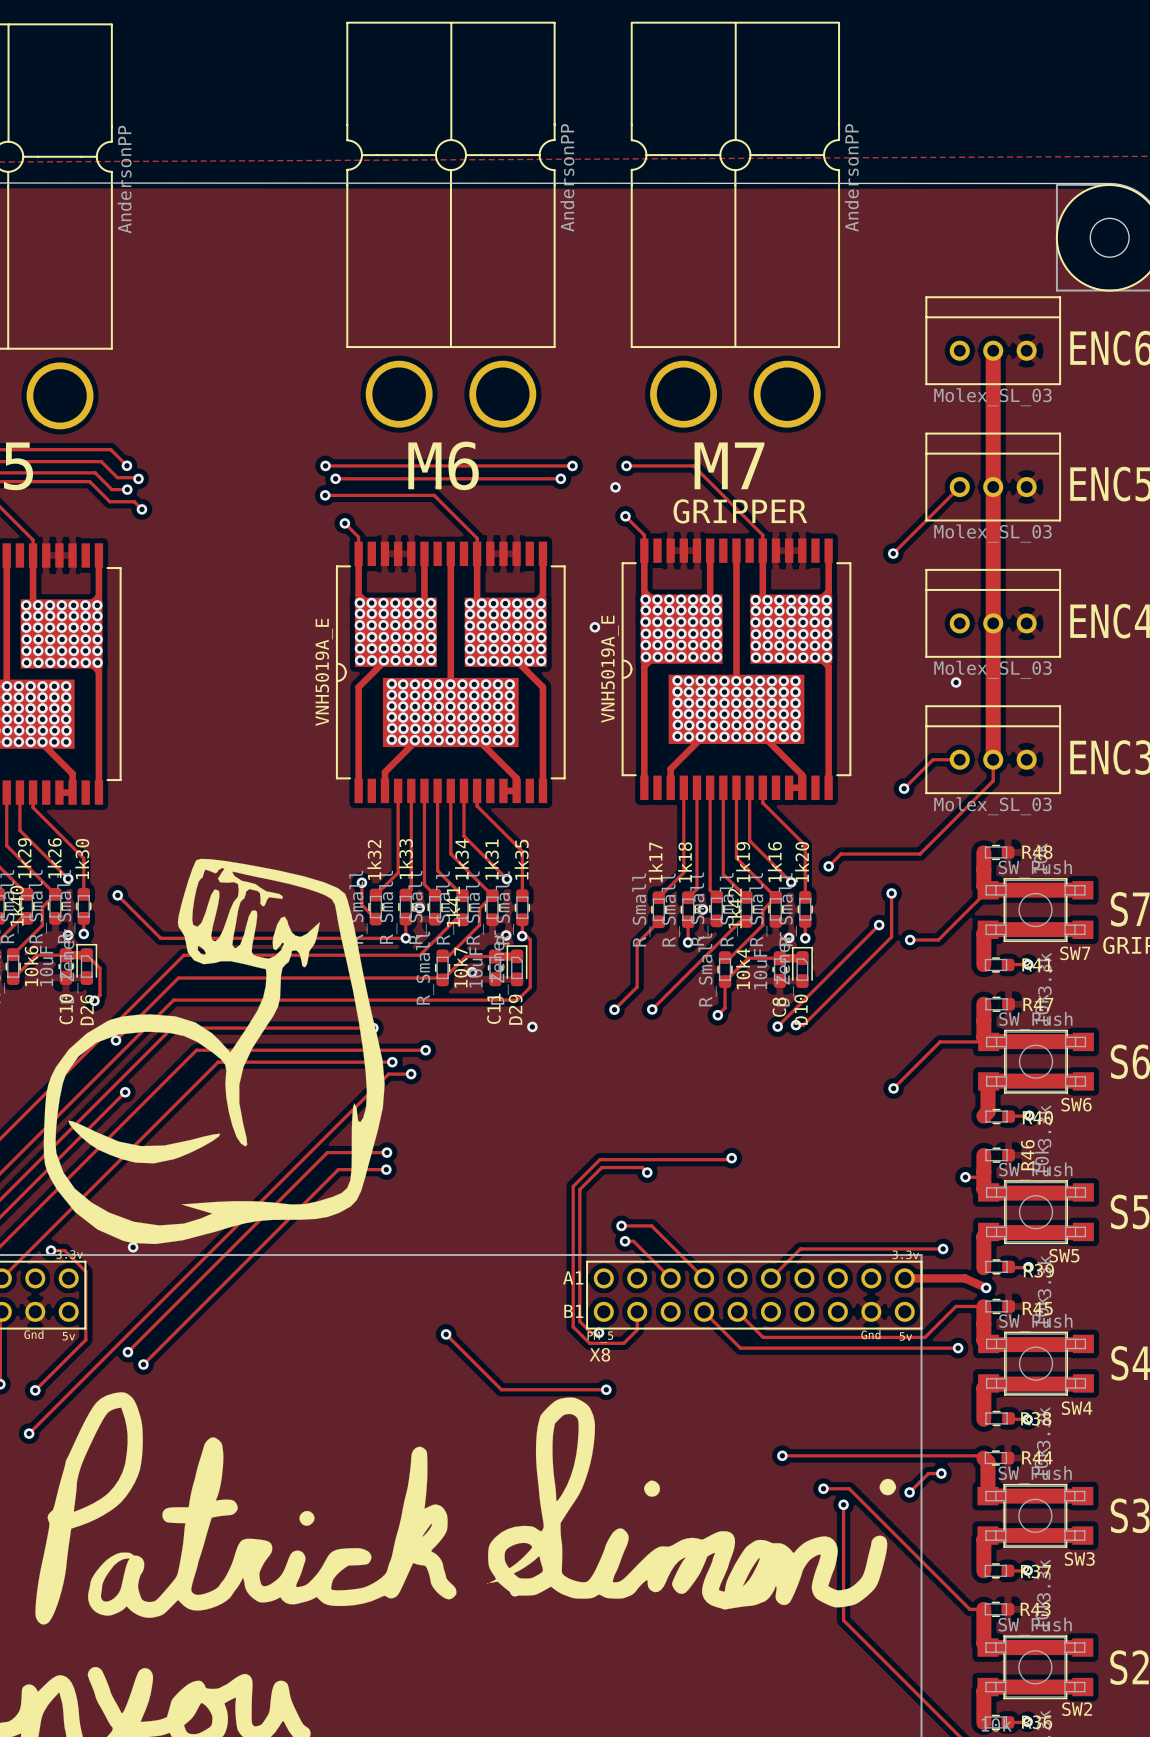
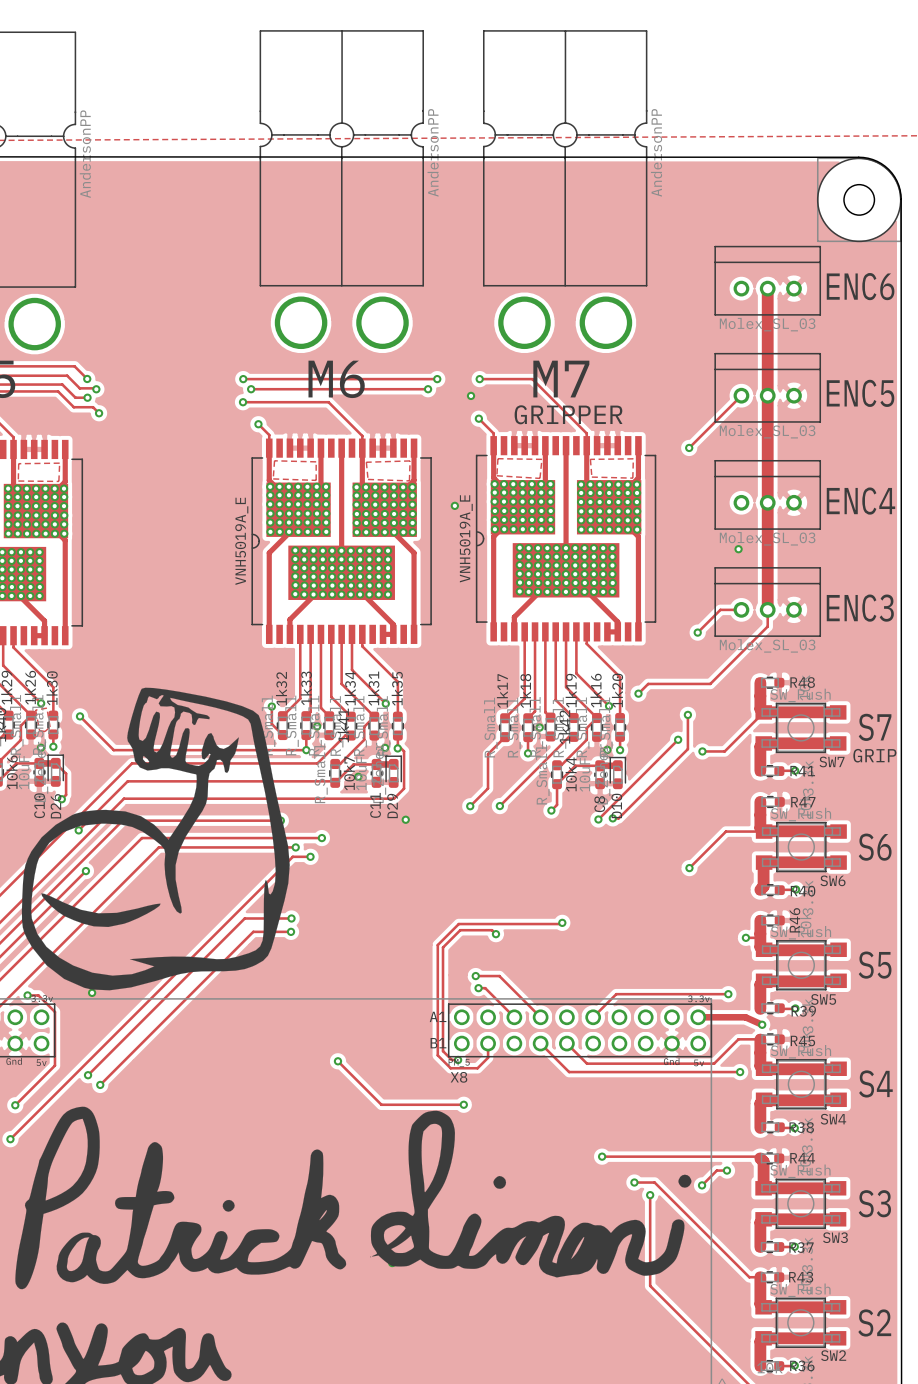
zone outline: none -> (497, 458) (541, 459) (539, 478) (496, 475) (497, 458)
zone outline: none -> (633, 458) (632, 478) (591, 477) (590, 459) (633, 458)
zone outline: none -> (274, 460) (316, 461) (316, 480) (273, 478) (274, 460)
zone outline: none -> (410, 460) (409, 480) (368, 479) (366, 462) (410, 460)
zone outline: none -> (59, 463) (58, 481) (18, 481) (18, 463) (59, 463)
zone outline: none -> (46, 708) (50, 727) (45, 731) (39, 730) (35, 710) (46, 708)

